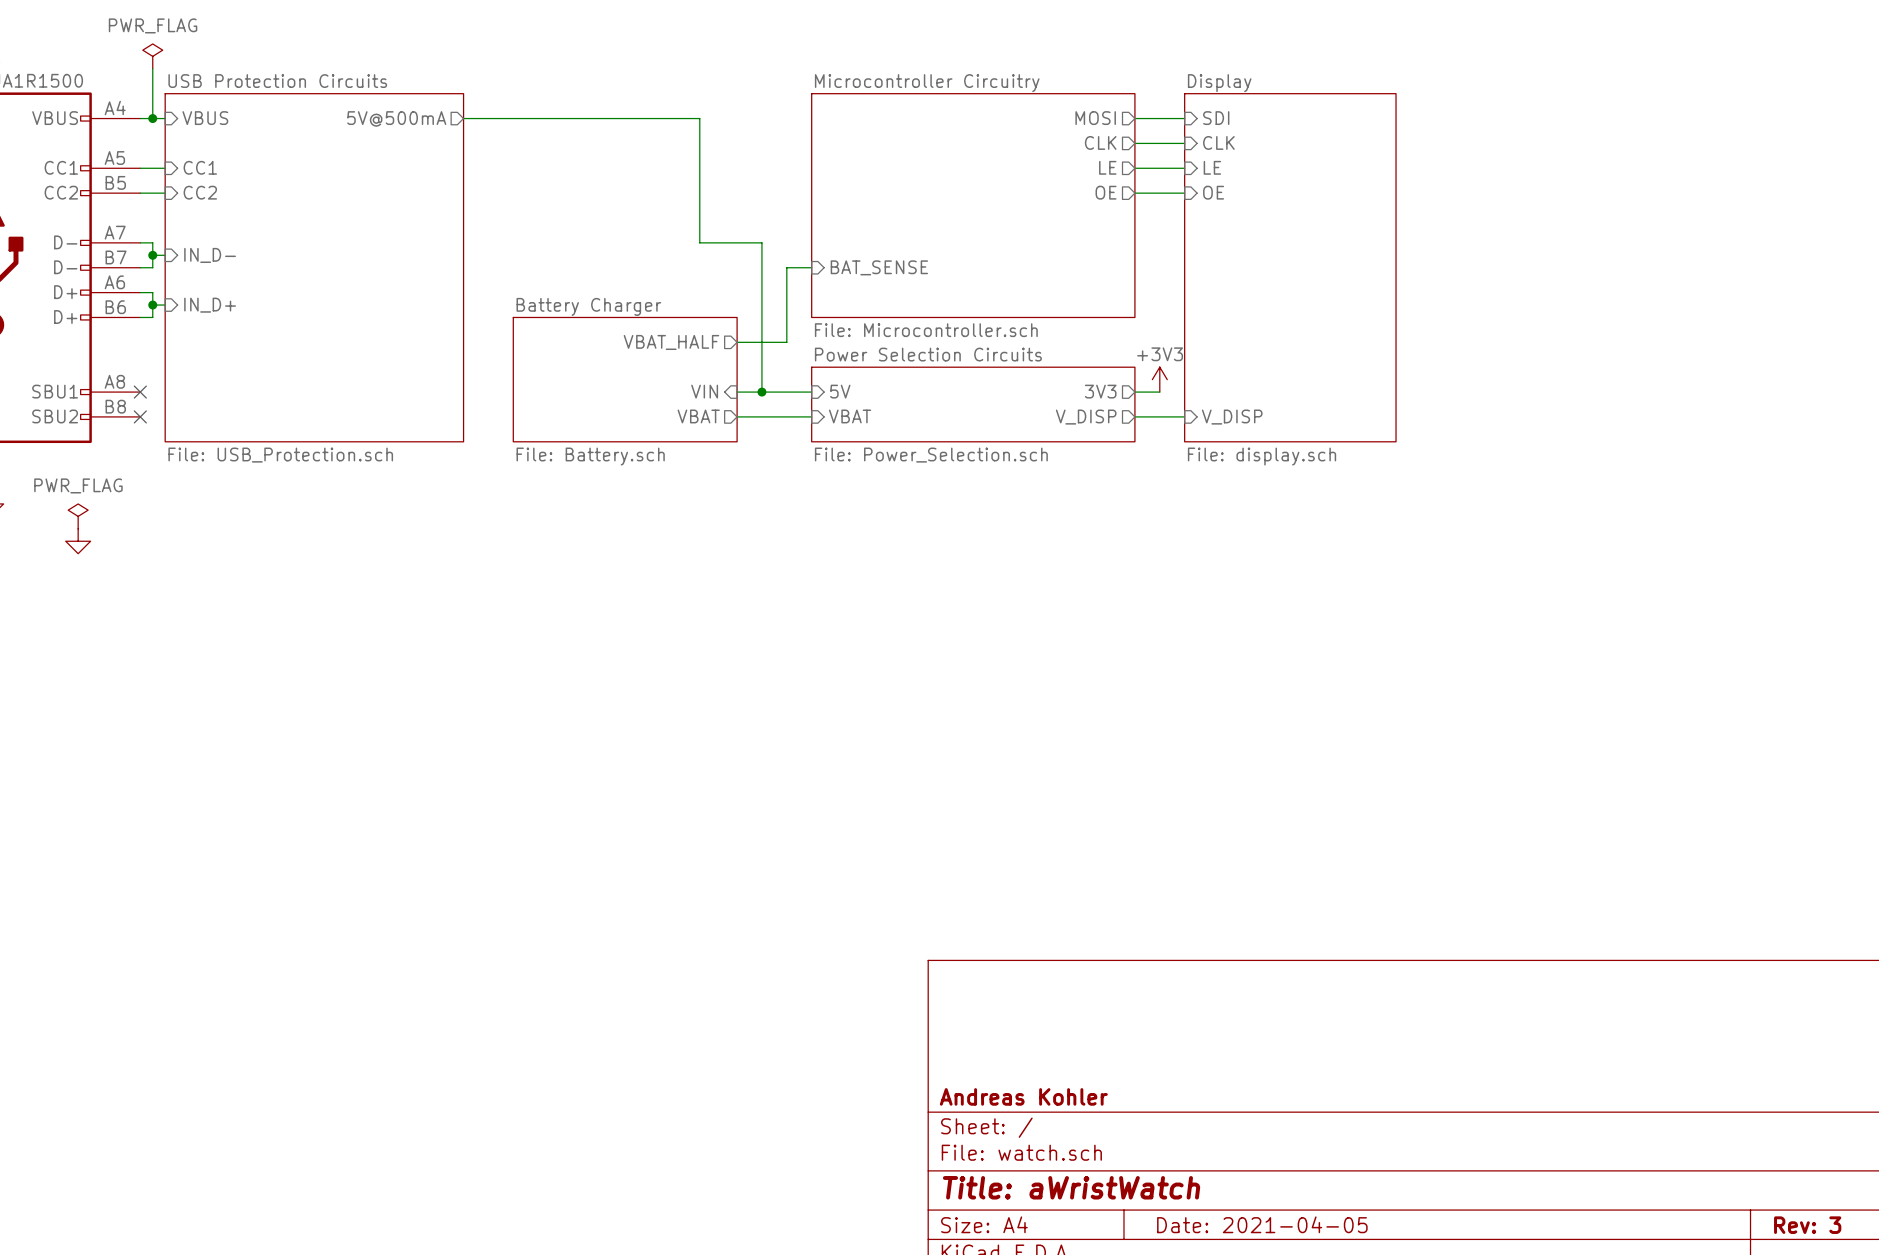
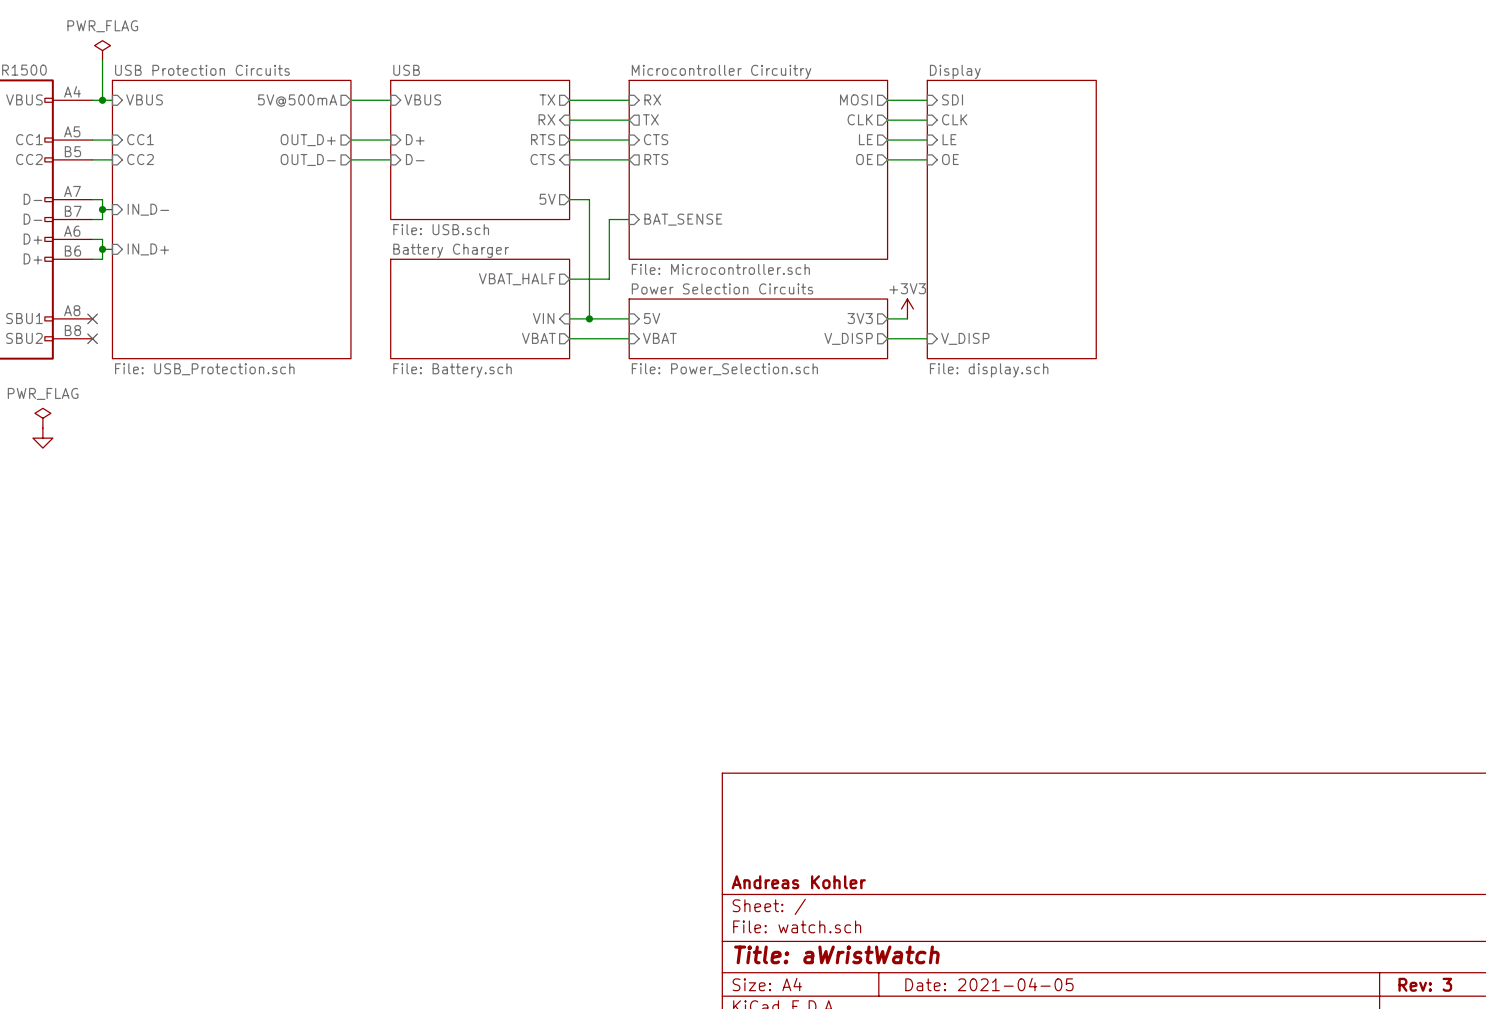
wire: (513, 118) (699, 118) (699, 242) (737, 242) -> none
sheet pin: none -> VBUS (422, 99)
sheet pin: none -> TX (547, 99)
wire: none -> (569, 100) (629, 100)
sheet pin: none -> RX (652, 99)
sheet pin: none -> RX (546, 119)
sheet pin: none -> TX (650, 119)
wire: none -> (569, 120) (629, 120)
sheet pin: none -> D+ (415, 139)
sheet pin: none -> RTS (542, 139)
sheet pin: none -> CTS (656, 139)
sheet pin: none -> OUT_D+ (308, 140)
wire: none -> (350, 140) (390, 140)
wire: none -> (569, 140) (629, 140)
sheet USB: none -> File: USB.sch (480, 149)
sheet pin: none -> D- (415, 159)
sheet pin: none -> CTS (542, 159)
sheet pin: none -> RTS (656, 159)
sheet pin: none -> OUT_D- (308, 160)
wire: none -> (350, 159) (390, 159)
wire: none -> (569, 159) (629, 159)
sheet pin: none -> 5V (547, 199)

